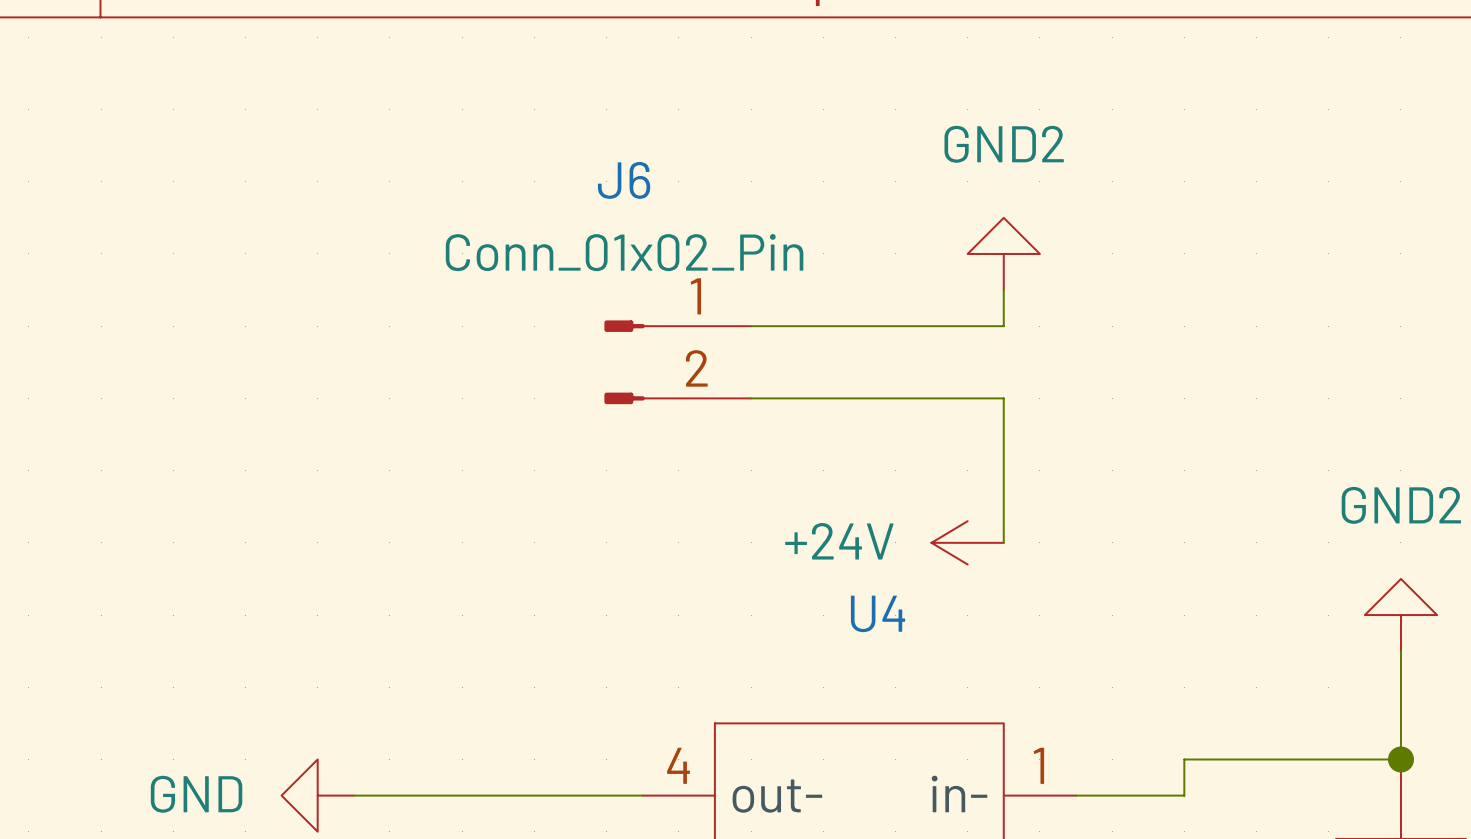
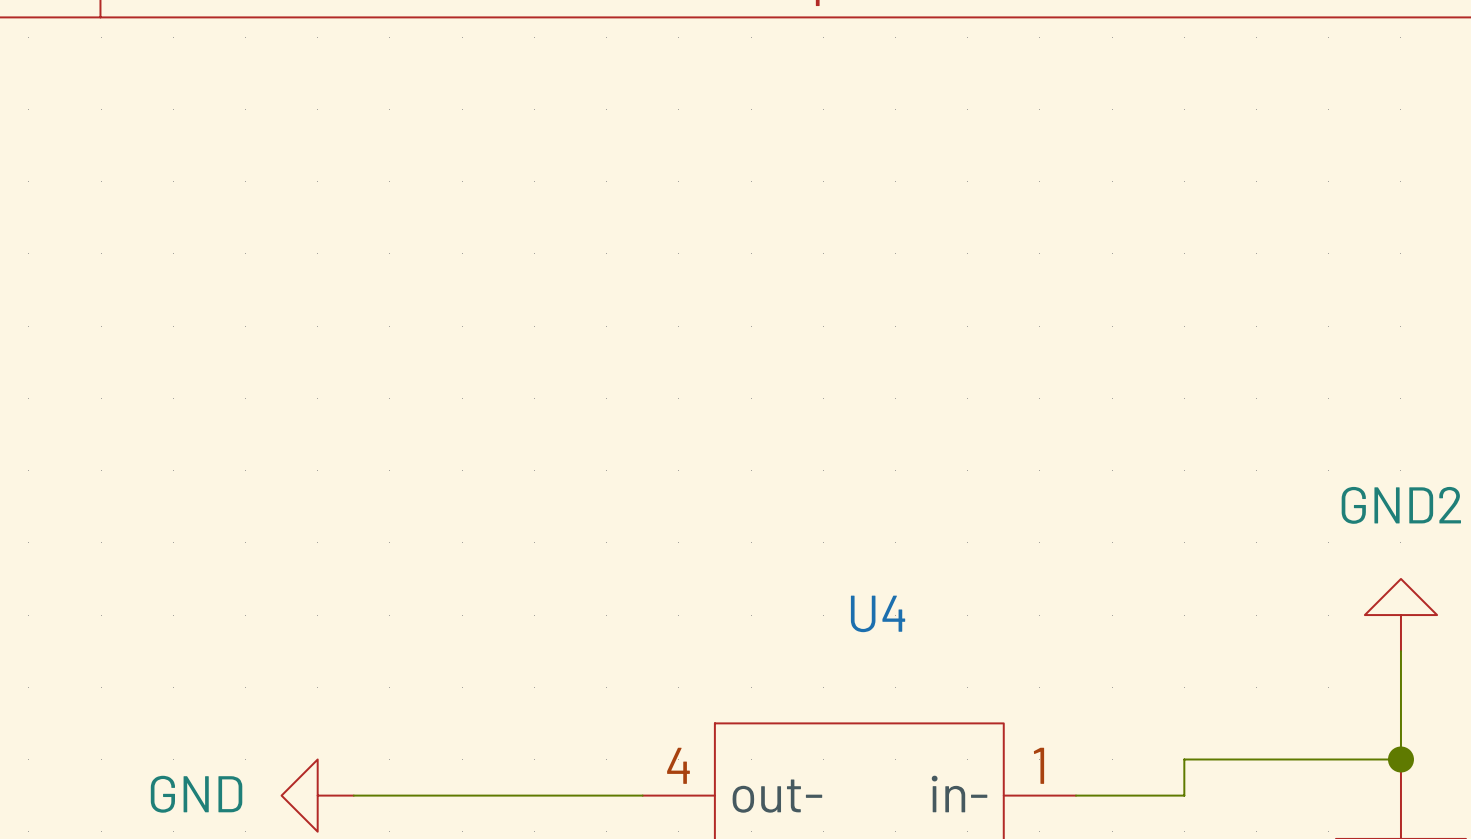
power symbol: GND2 (1003, 253) -> none
wire: (1003, 290) (1003, 326) (751, 326) -> none
J6: Conn_01x02_Pin (677, 362) -> none
wire: (751, 398) (1003, 398) (1003, 542) -> none
power symbol: +24V (967, 542) -> none

